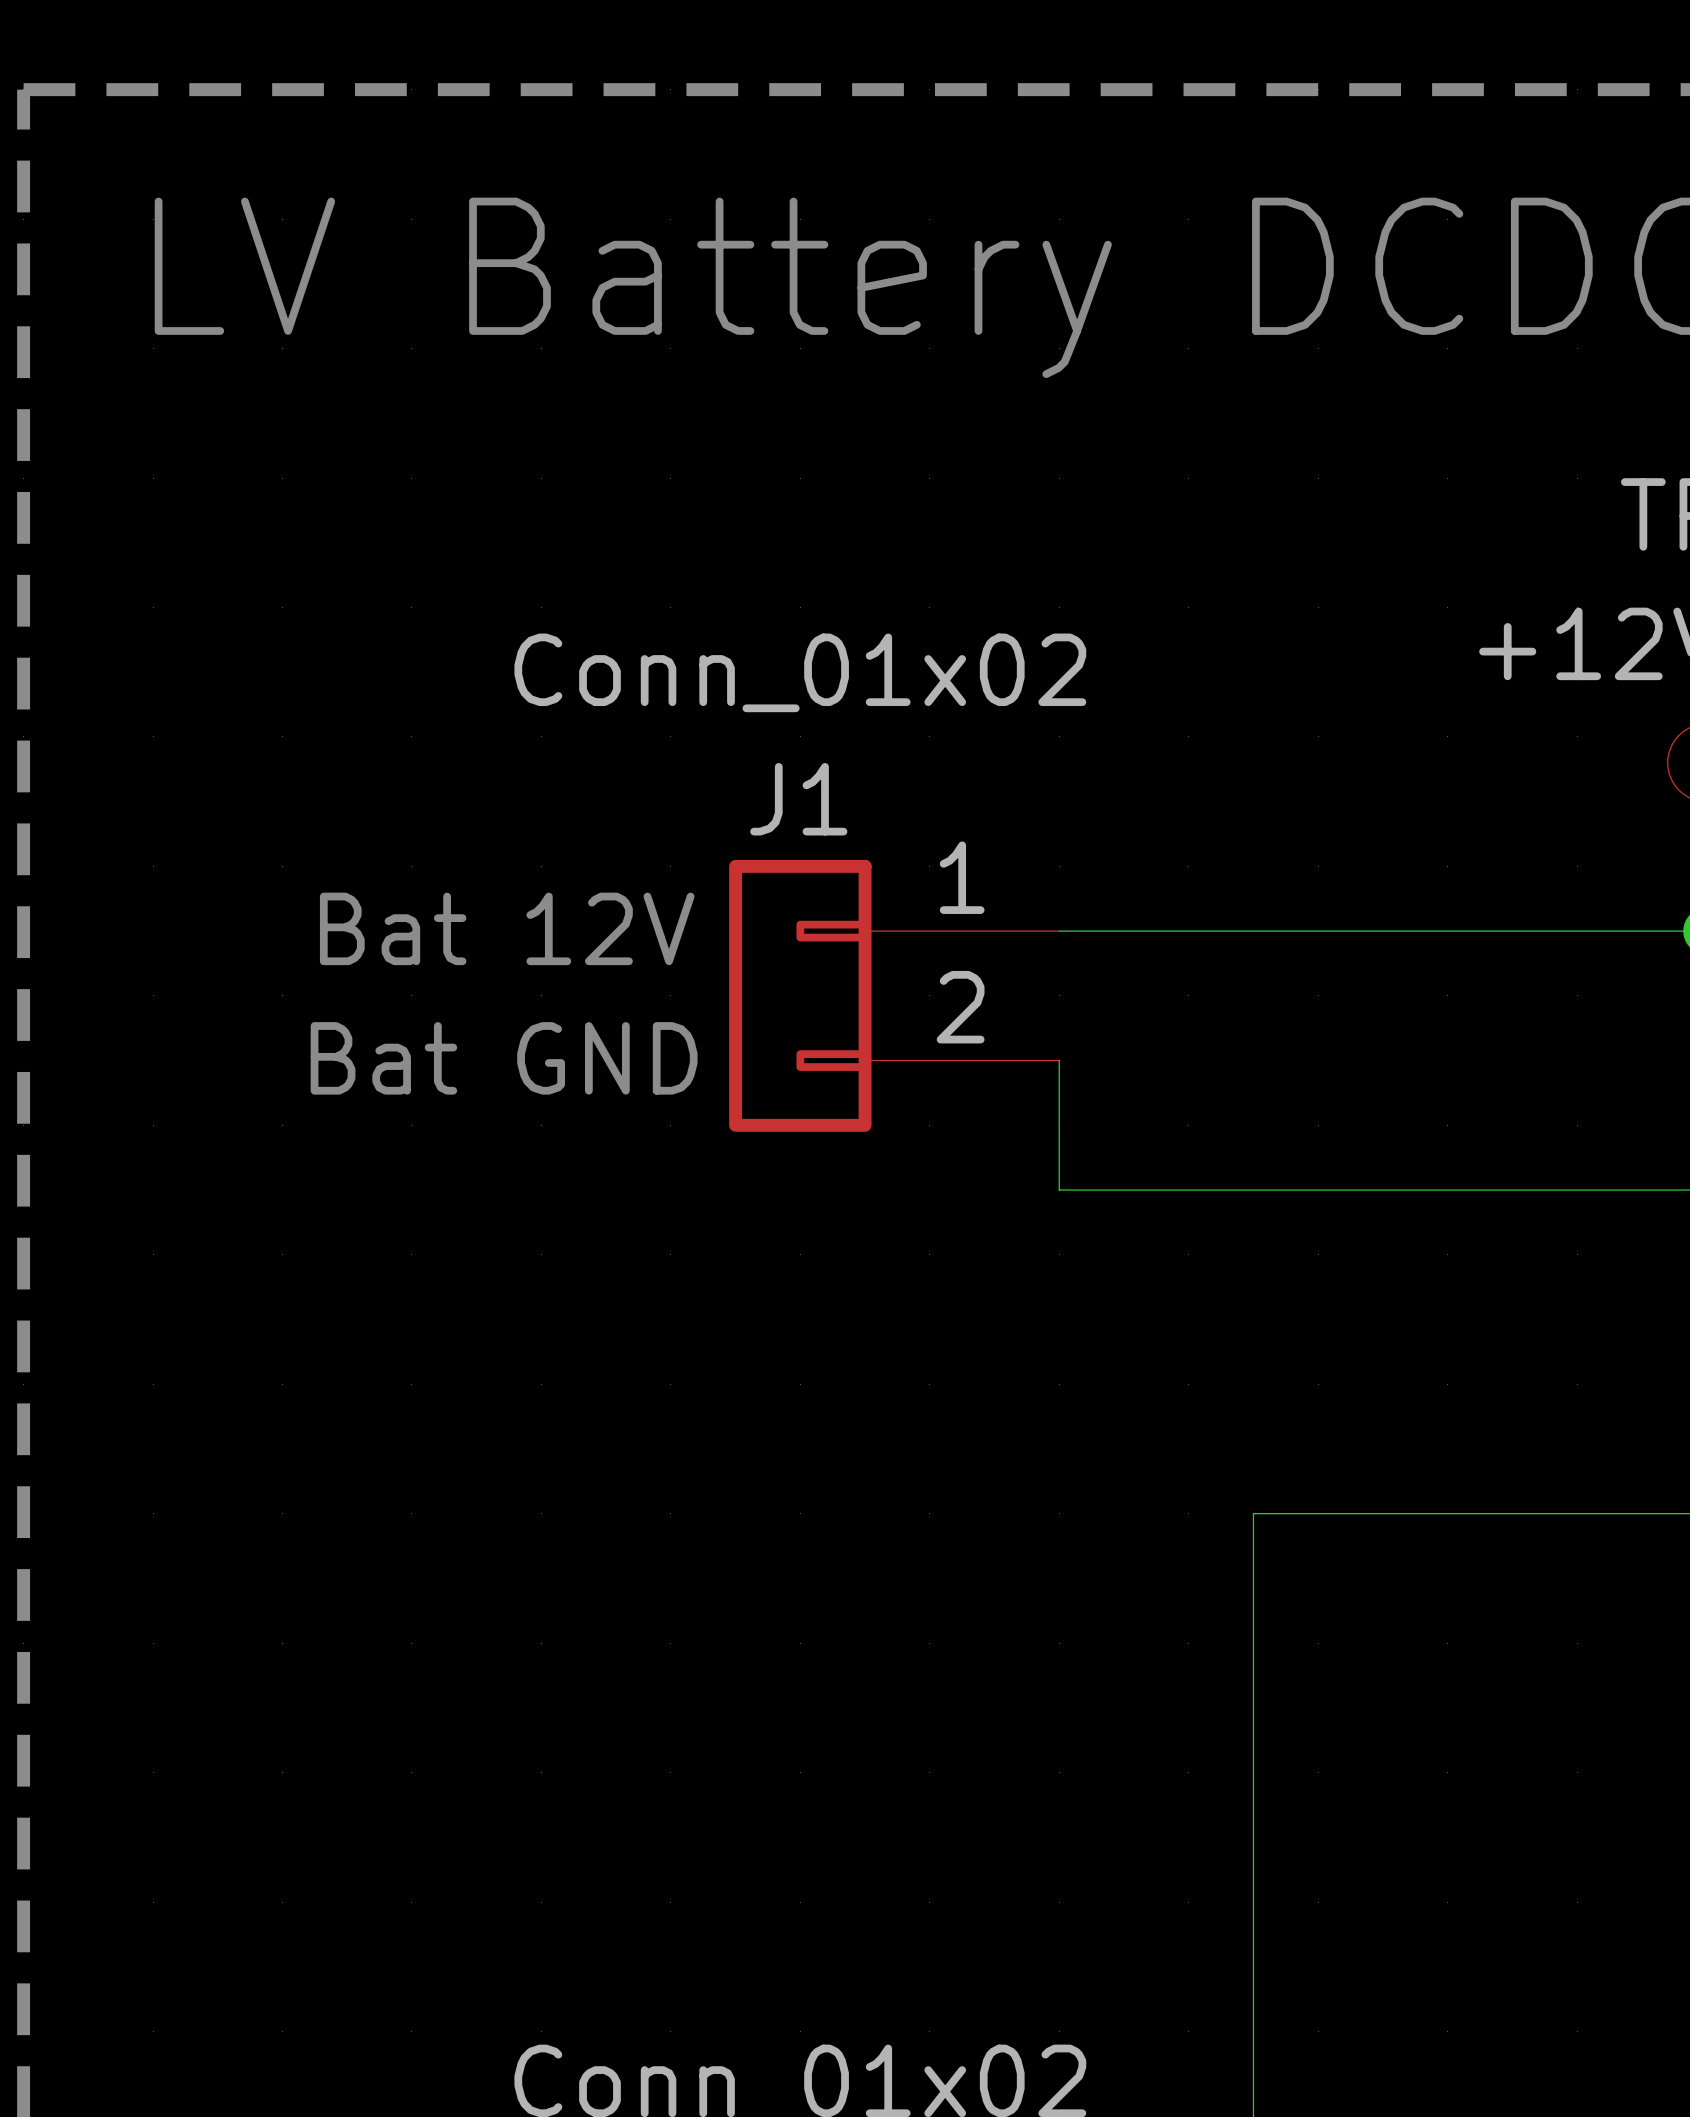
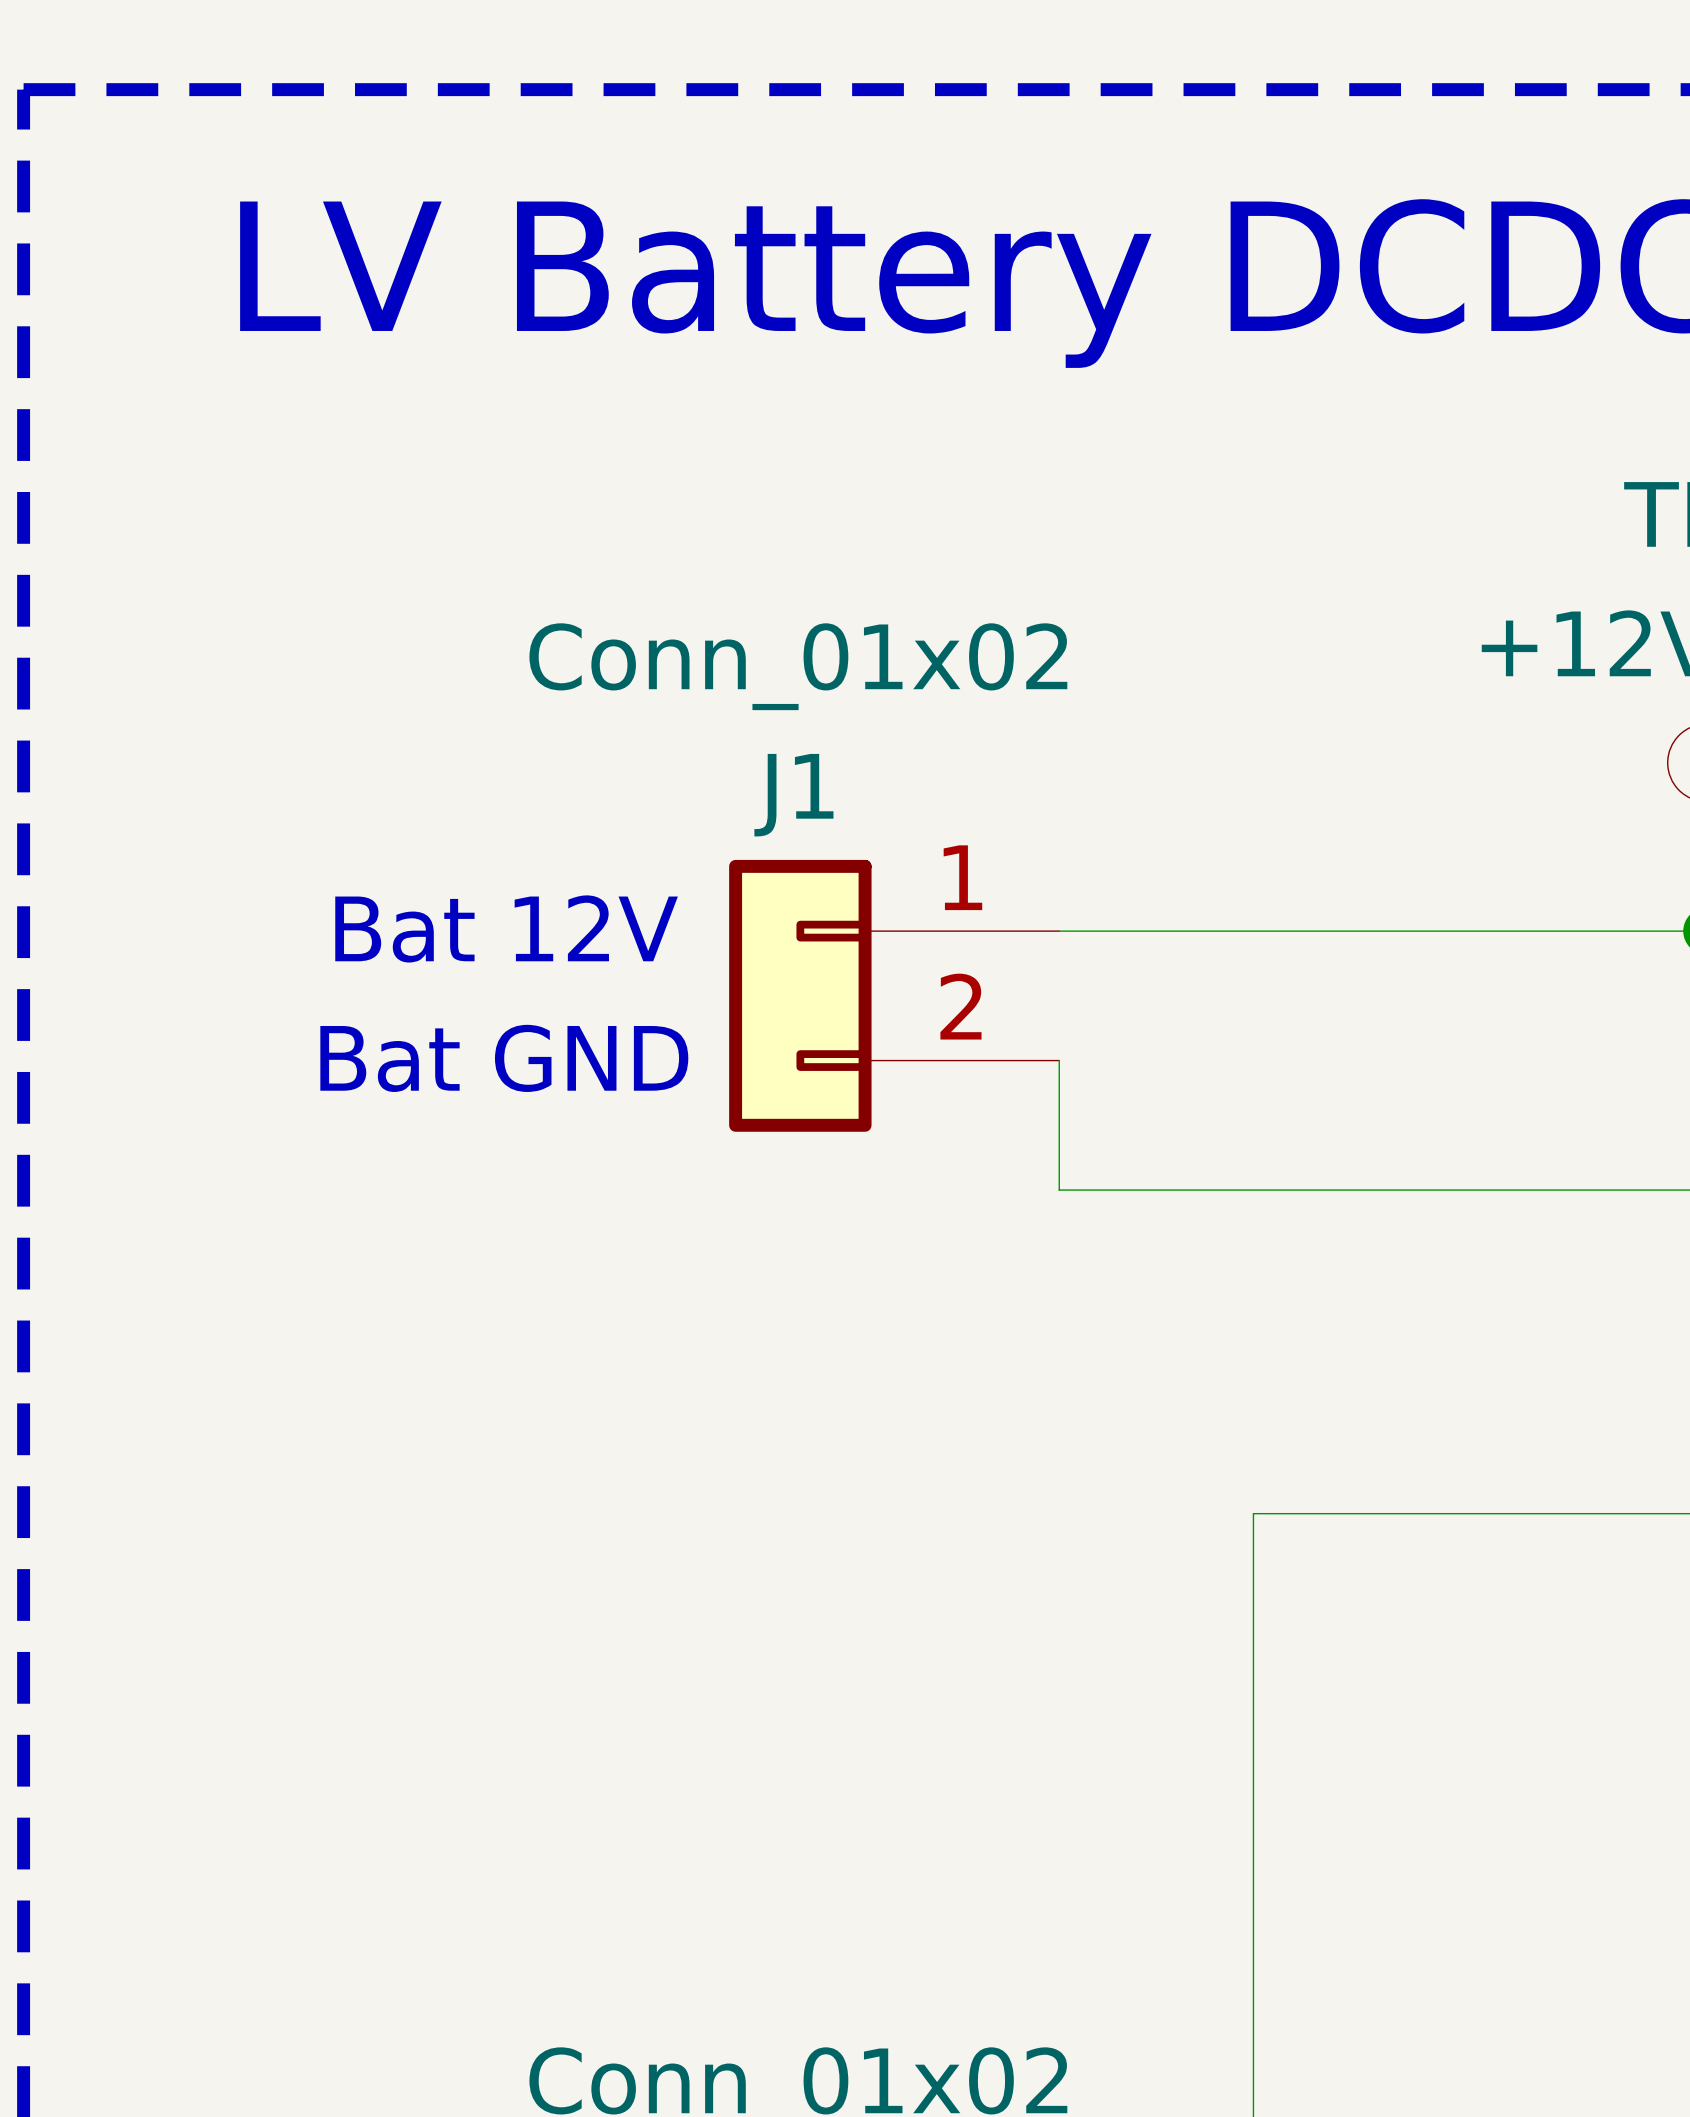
J1 value position: Conn_01x02 (800, 672) -> Conn_01x02 (798, 666)
J1 name position: J1 (798, 799) -> J1 (793, 795)

